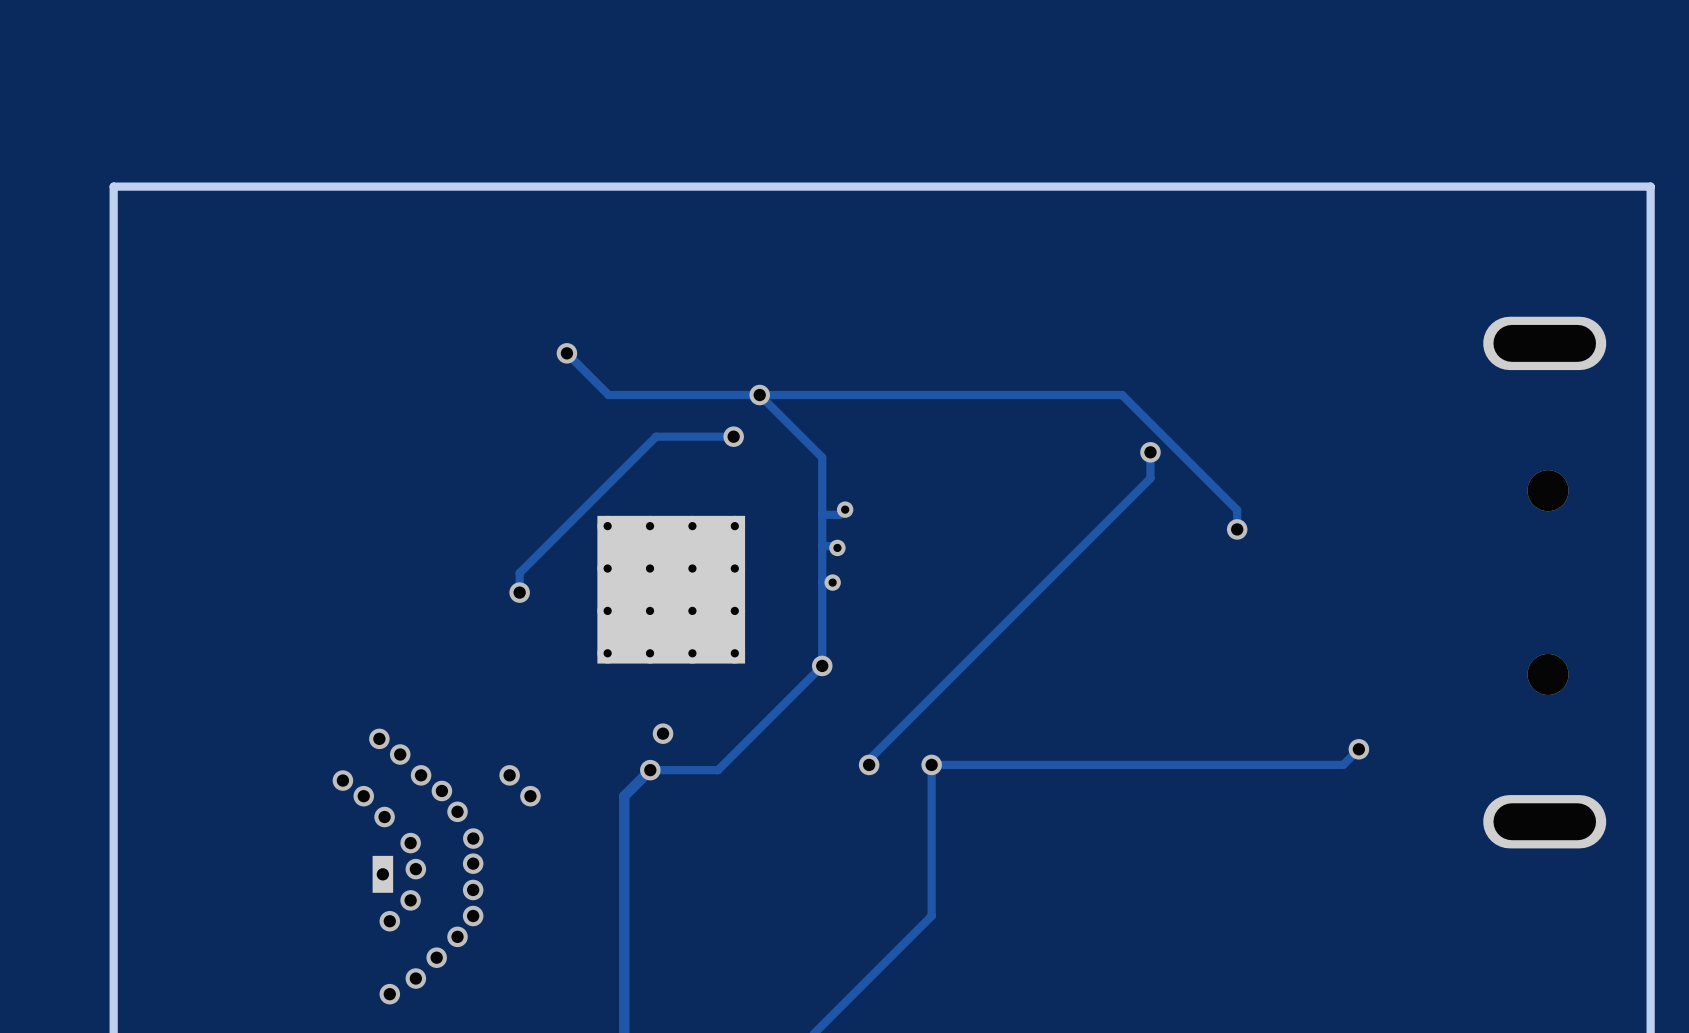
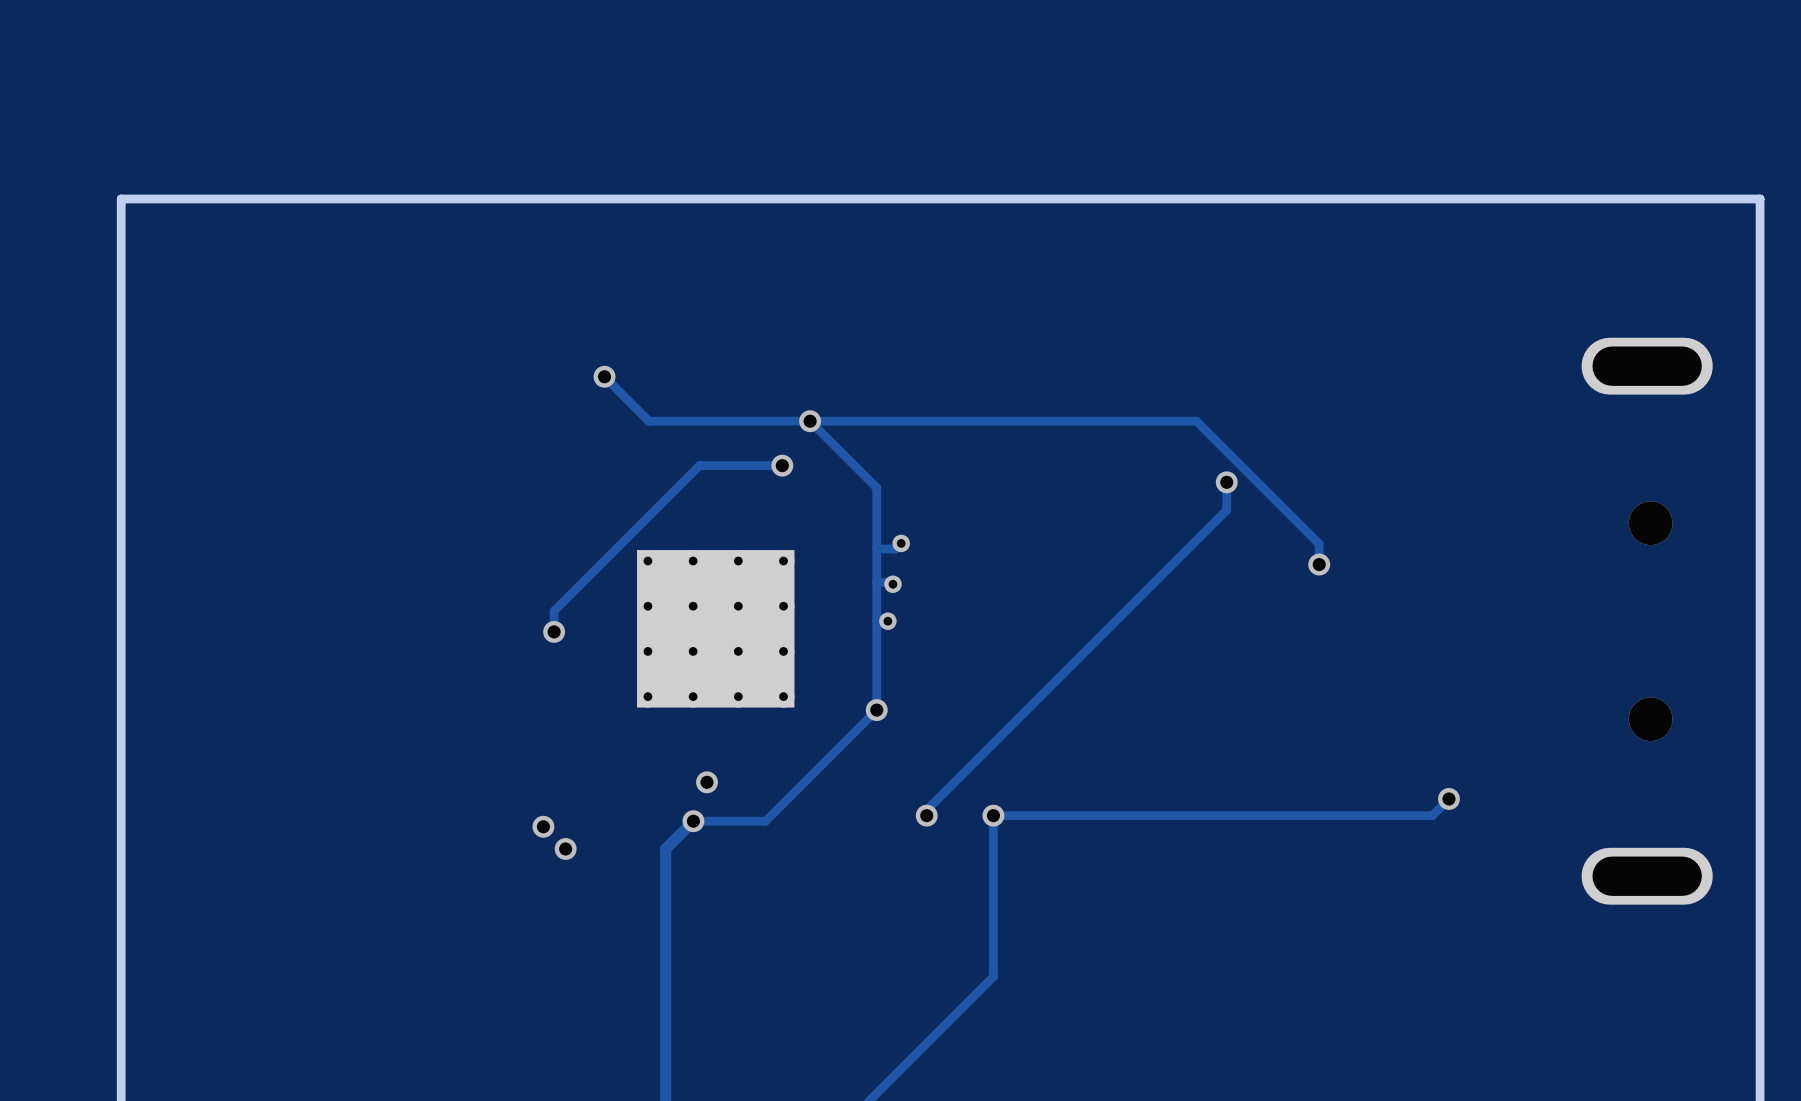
via: (379, 738) -> none
via: (400, 754) -> none
via: (421, 775) -> none
via: (342, 780) -> none
via: (441, 790) -> none
via: (363, 796) -> none
via: (457, 811) -> none
via: (384, 817) -> none
via: (473, 838) -> none
via: (410, 843) -> none
via: (473, 863) -> none
via: (415, 869) -> none
part: (382, 874) -> none
via: (473, 889) -> none
via: (410, 900) -> none
via: (473, 916) -> none
via: (389, 921) -> none
via: (457, 936) -> none
via: (436, 957) -> none
via: (415, 978) -> none
via: (389, 994) -> none

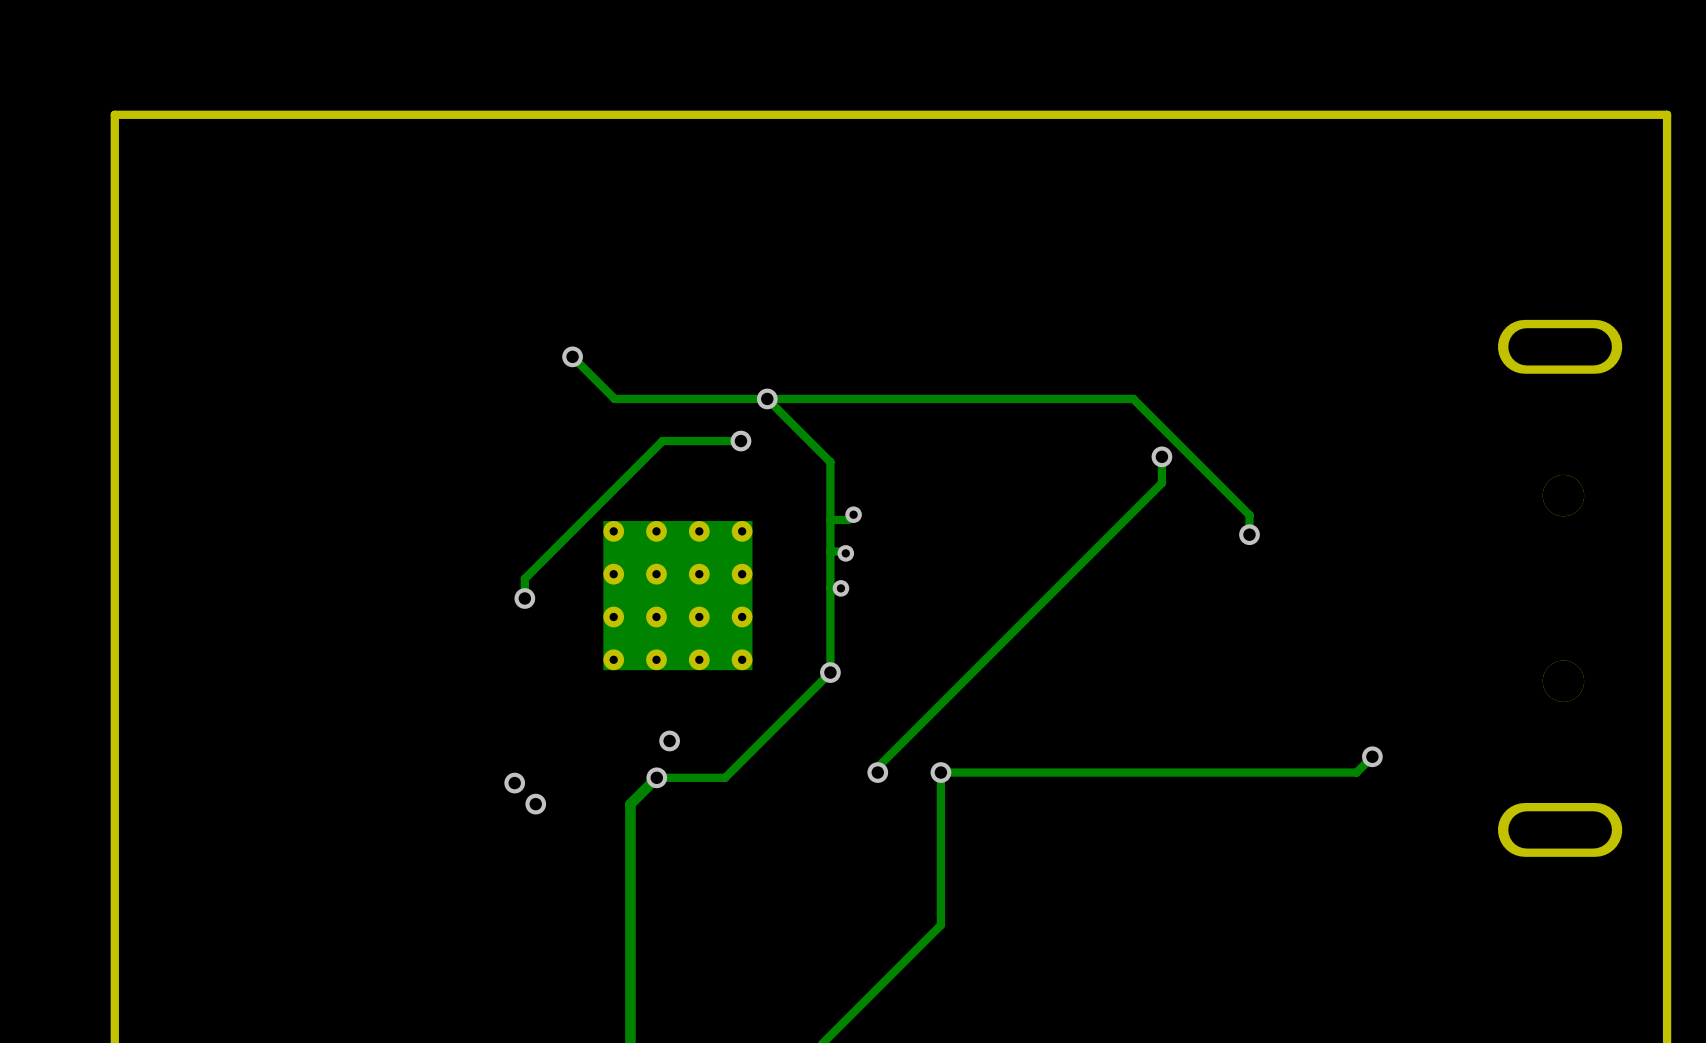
board edge: (1760, 198) (121, 198) -> (1667, 188) (1667, 114) (114, 114) (114, 188)

